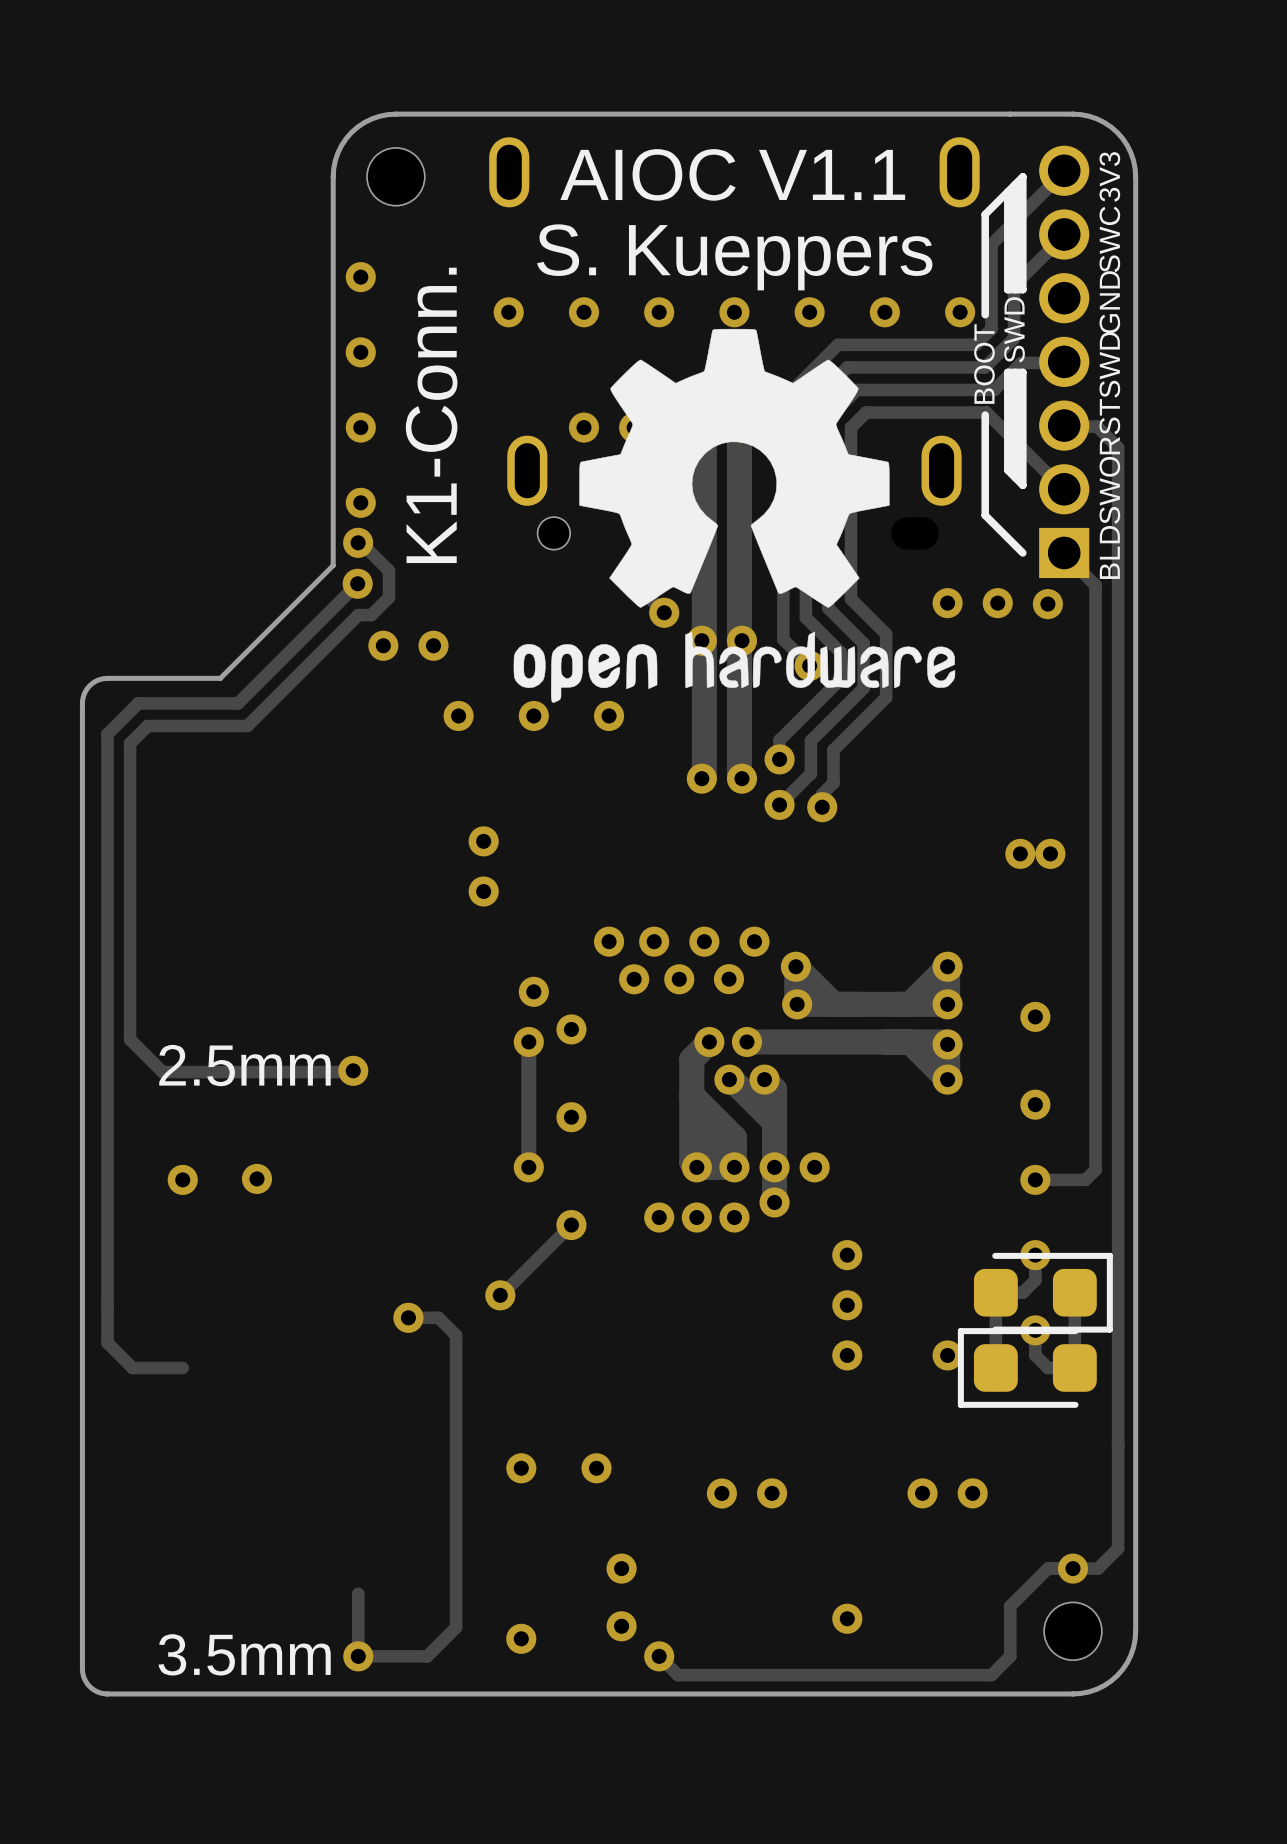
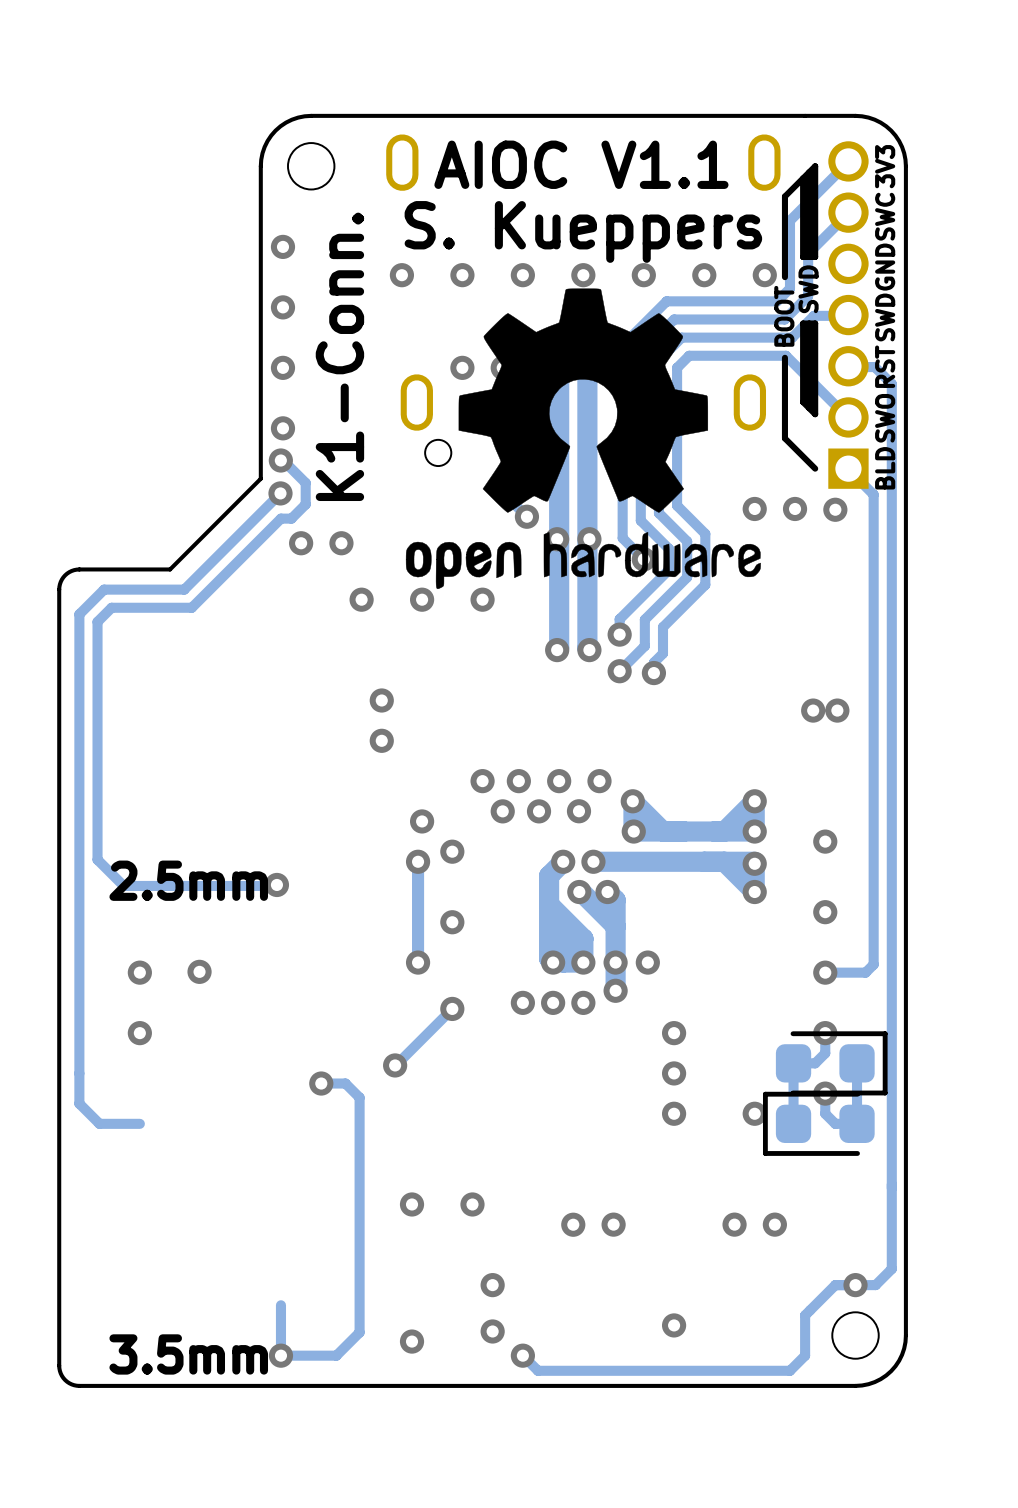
via: none -> (139, 1033)

